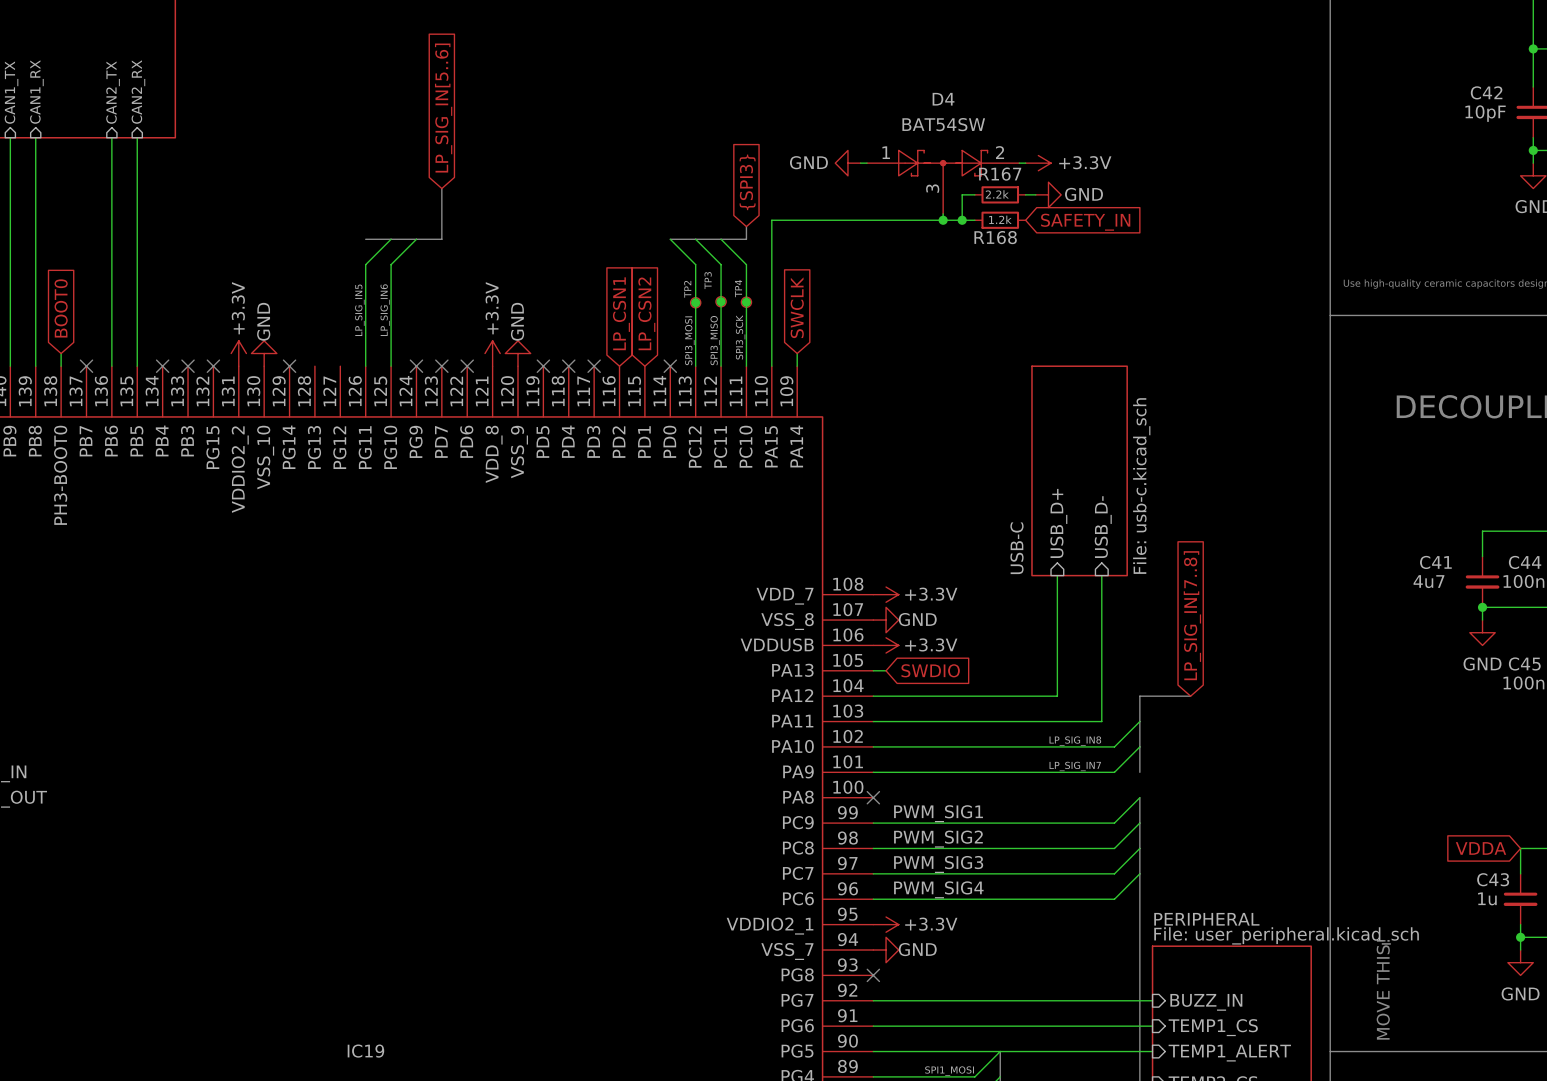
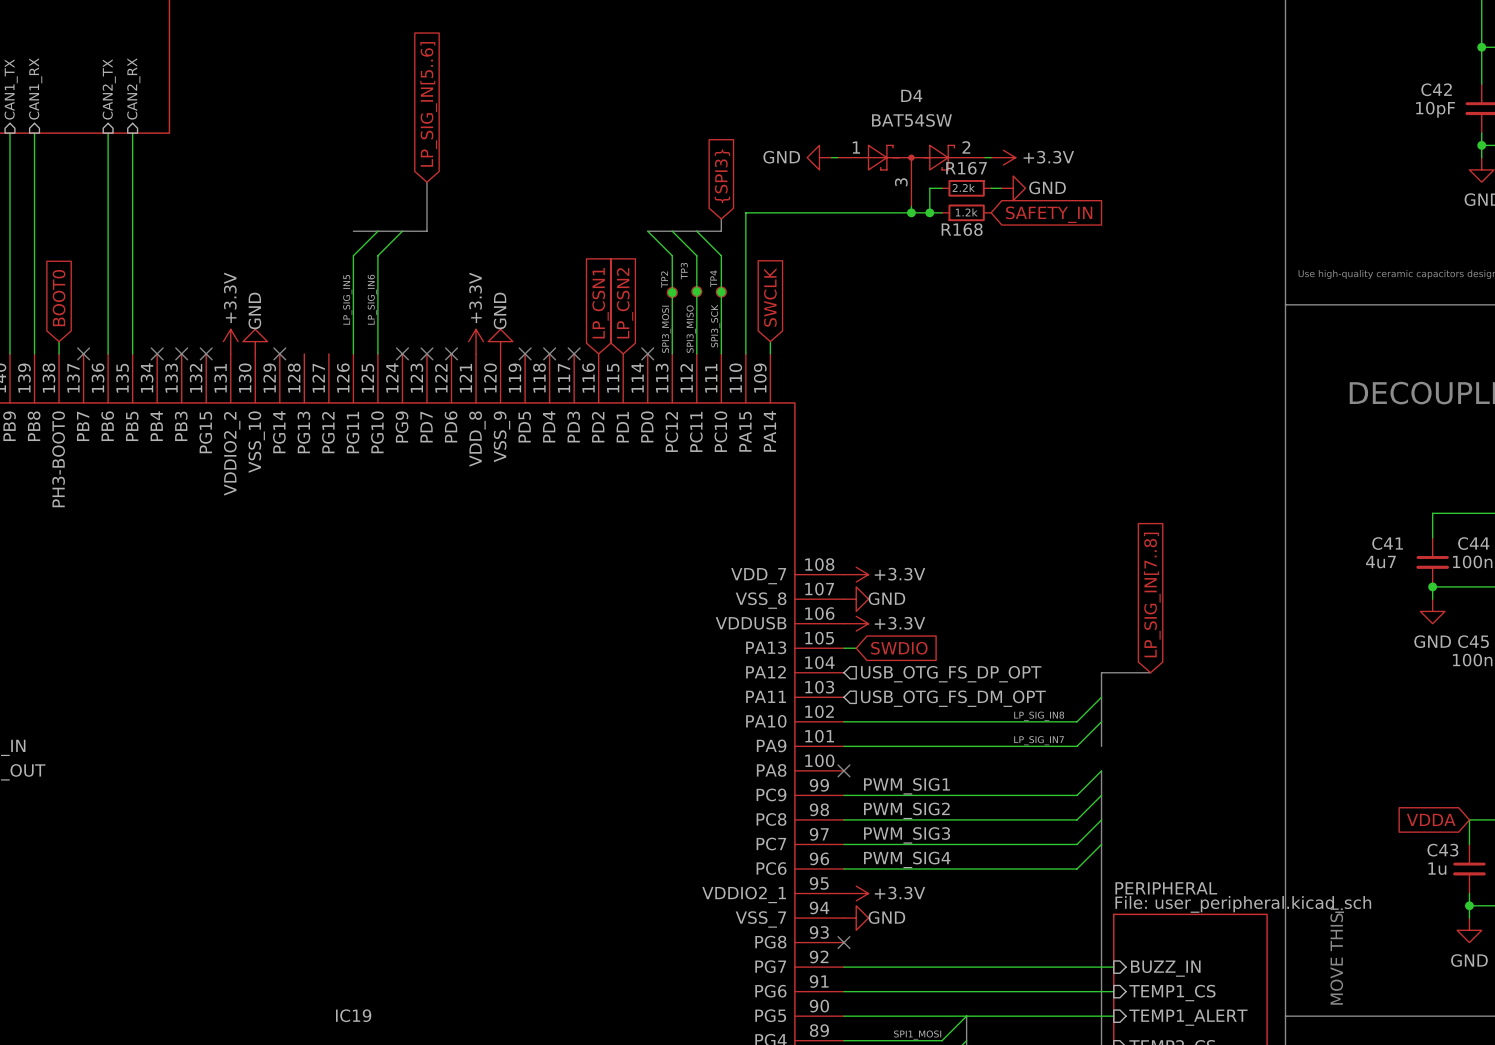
sheet USB-C: File: usb-c.kicad_sch (1079, 470) -> none
sheet pin: USB_D+ (1058, 523) -> none
sheet pin: USB_D- (1103, 527) -> none
wire: (1057, 575) (1057, 696) (873, 696) -> none
wire: (1101, 575) (1101, 721) (873, 721) -> none
hierarchical label: none -> USB_OTG_FS_DP_OPT (951, 674)
hierarchical label: none -> USB_OTG_FS_DM_OPT (953, 698)

